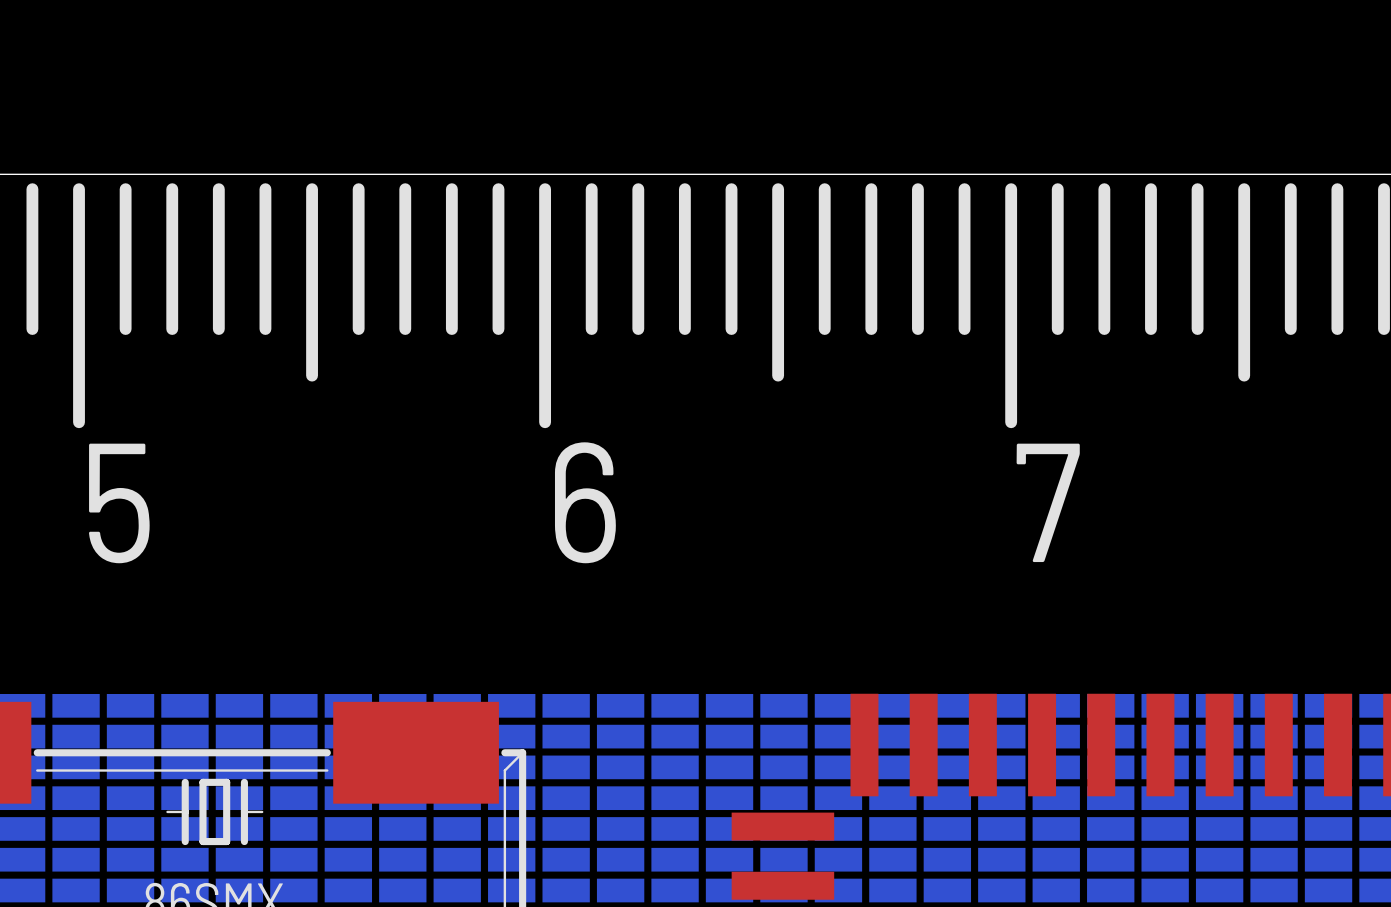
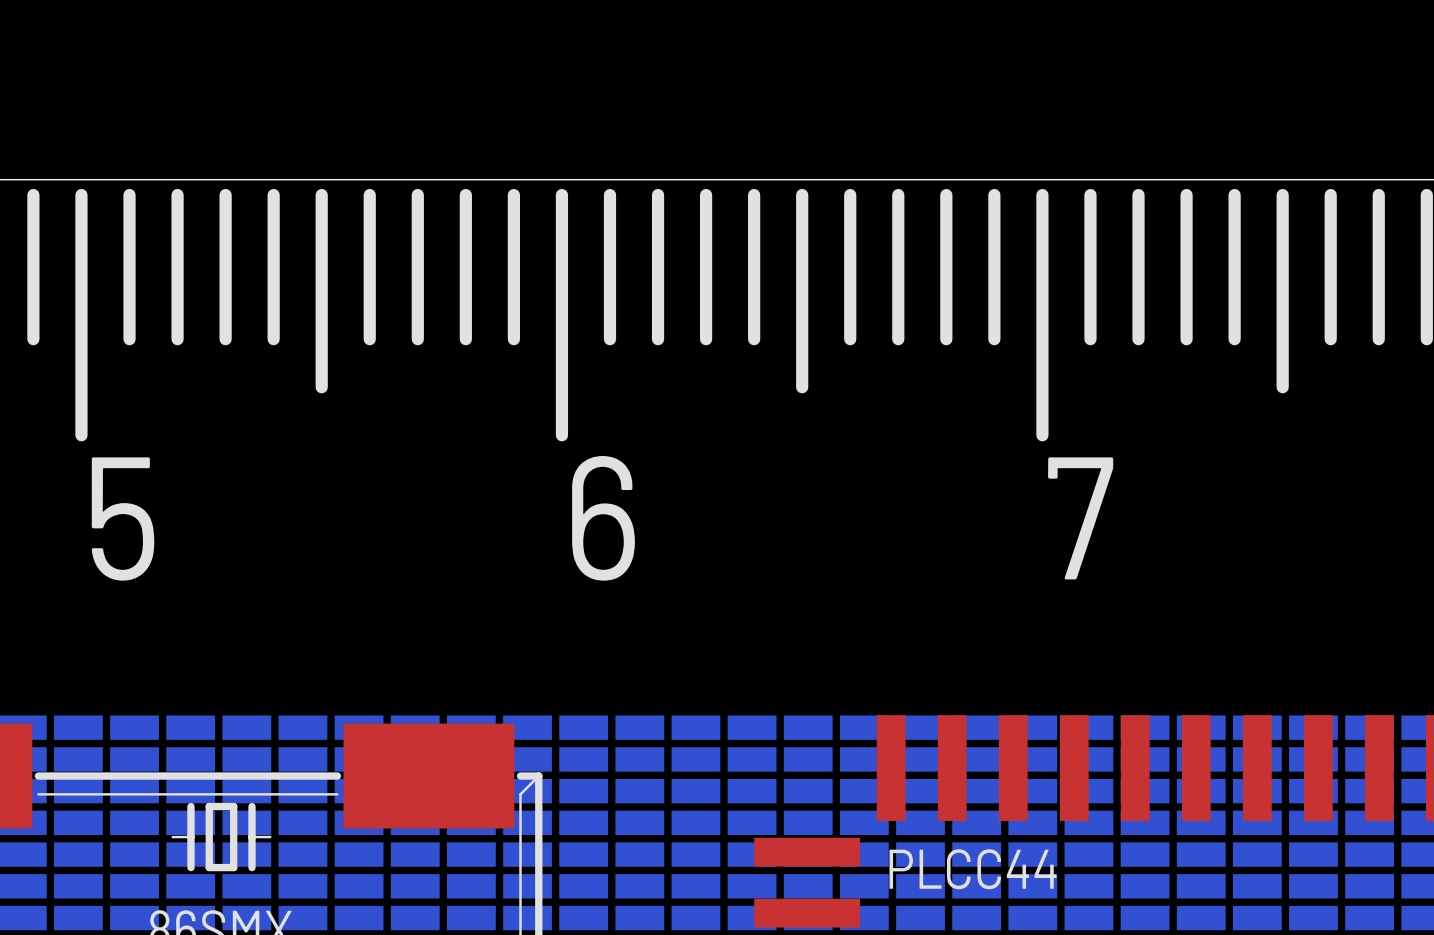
text: none -> PLCC44 (973, 869)

